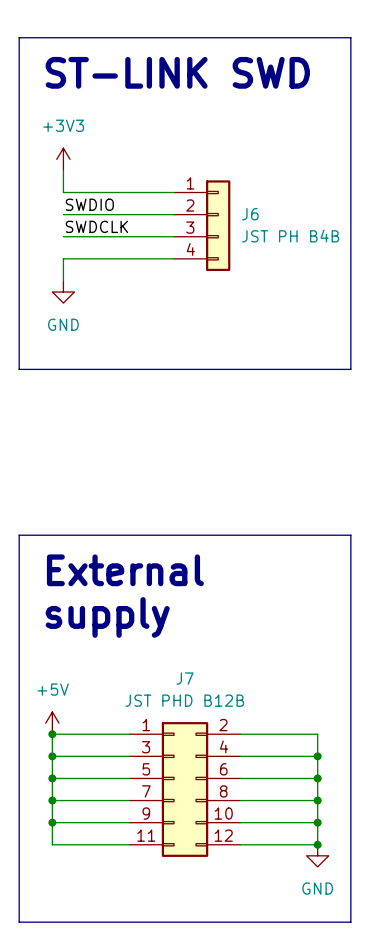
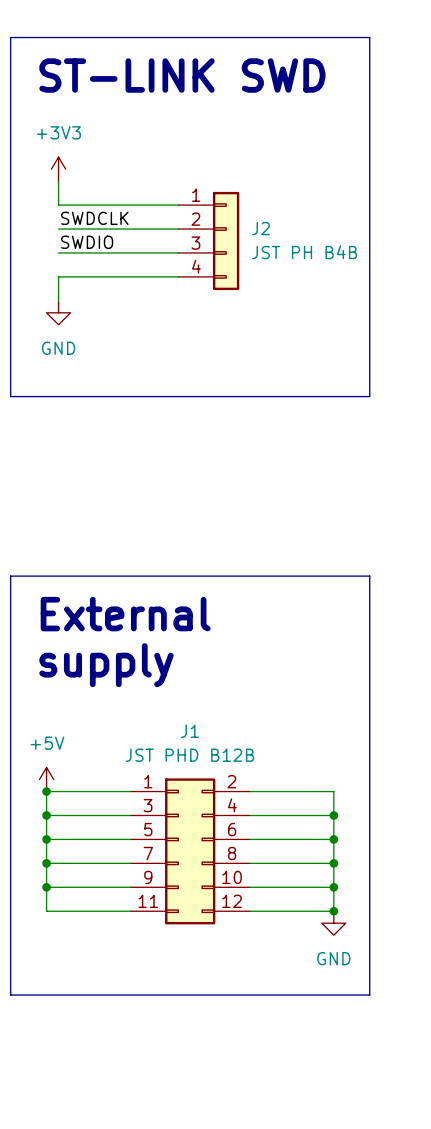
label: SWDIO (89, 204) -> SWDCLK (94, 218)
J6 name: J6 (250, 214) -> J2 (260, 228)
label: SWDCLK (96, 226) -> SWDIO (87, 242)
J7 name: J7 (185, 678) -> J1 (189, 731)

